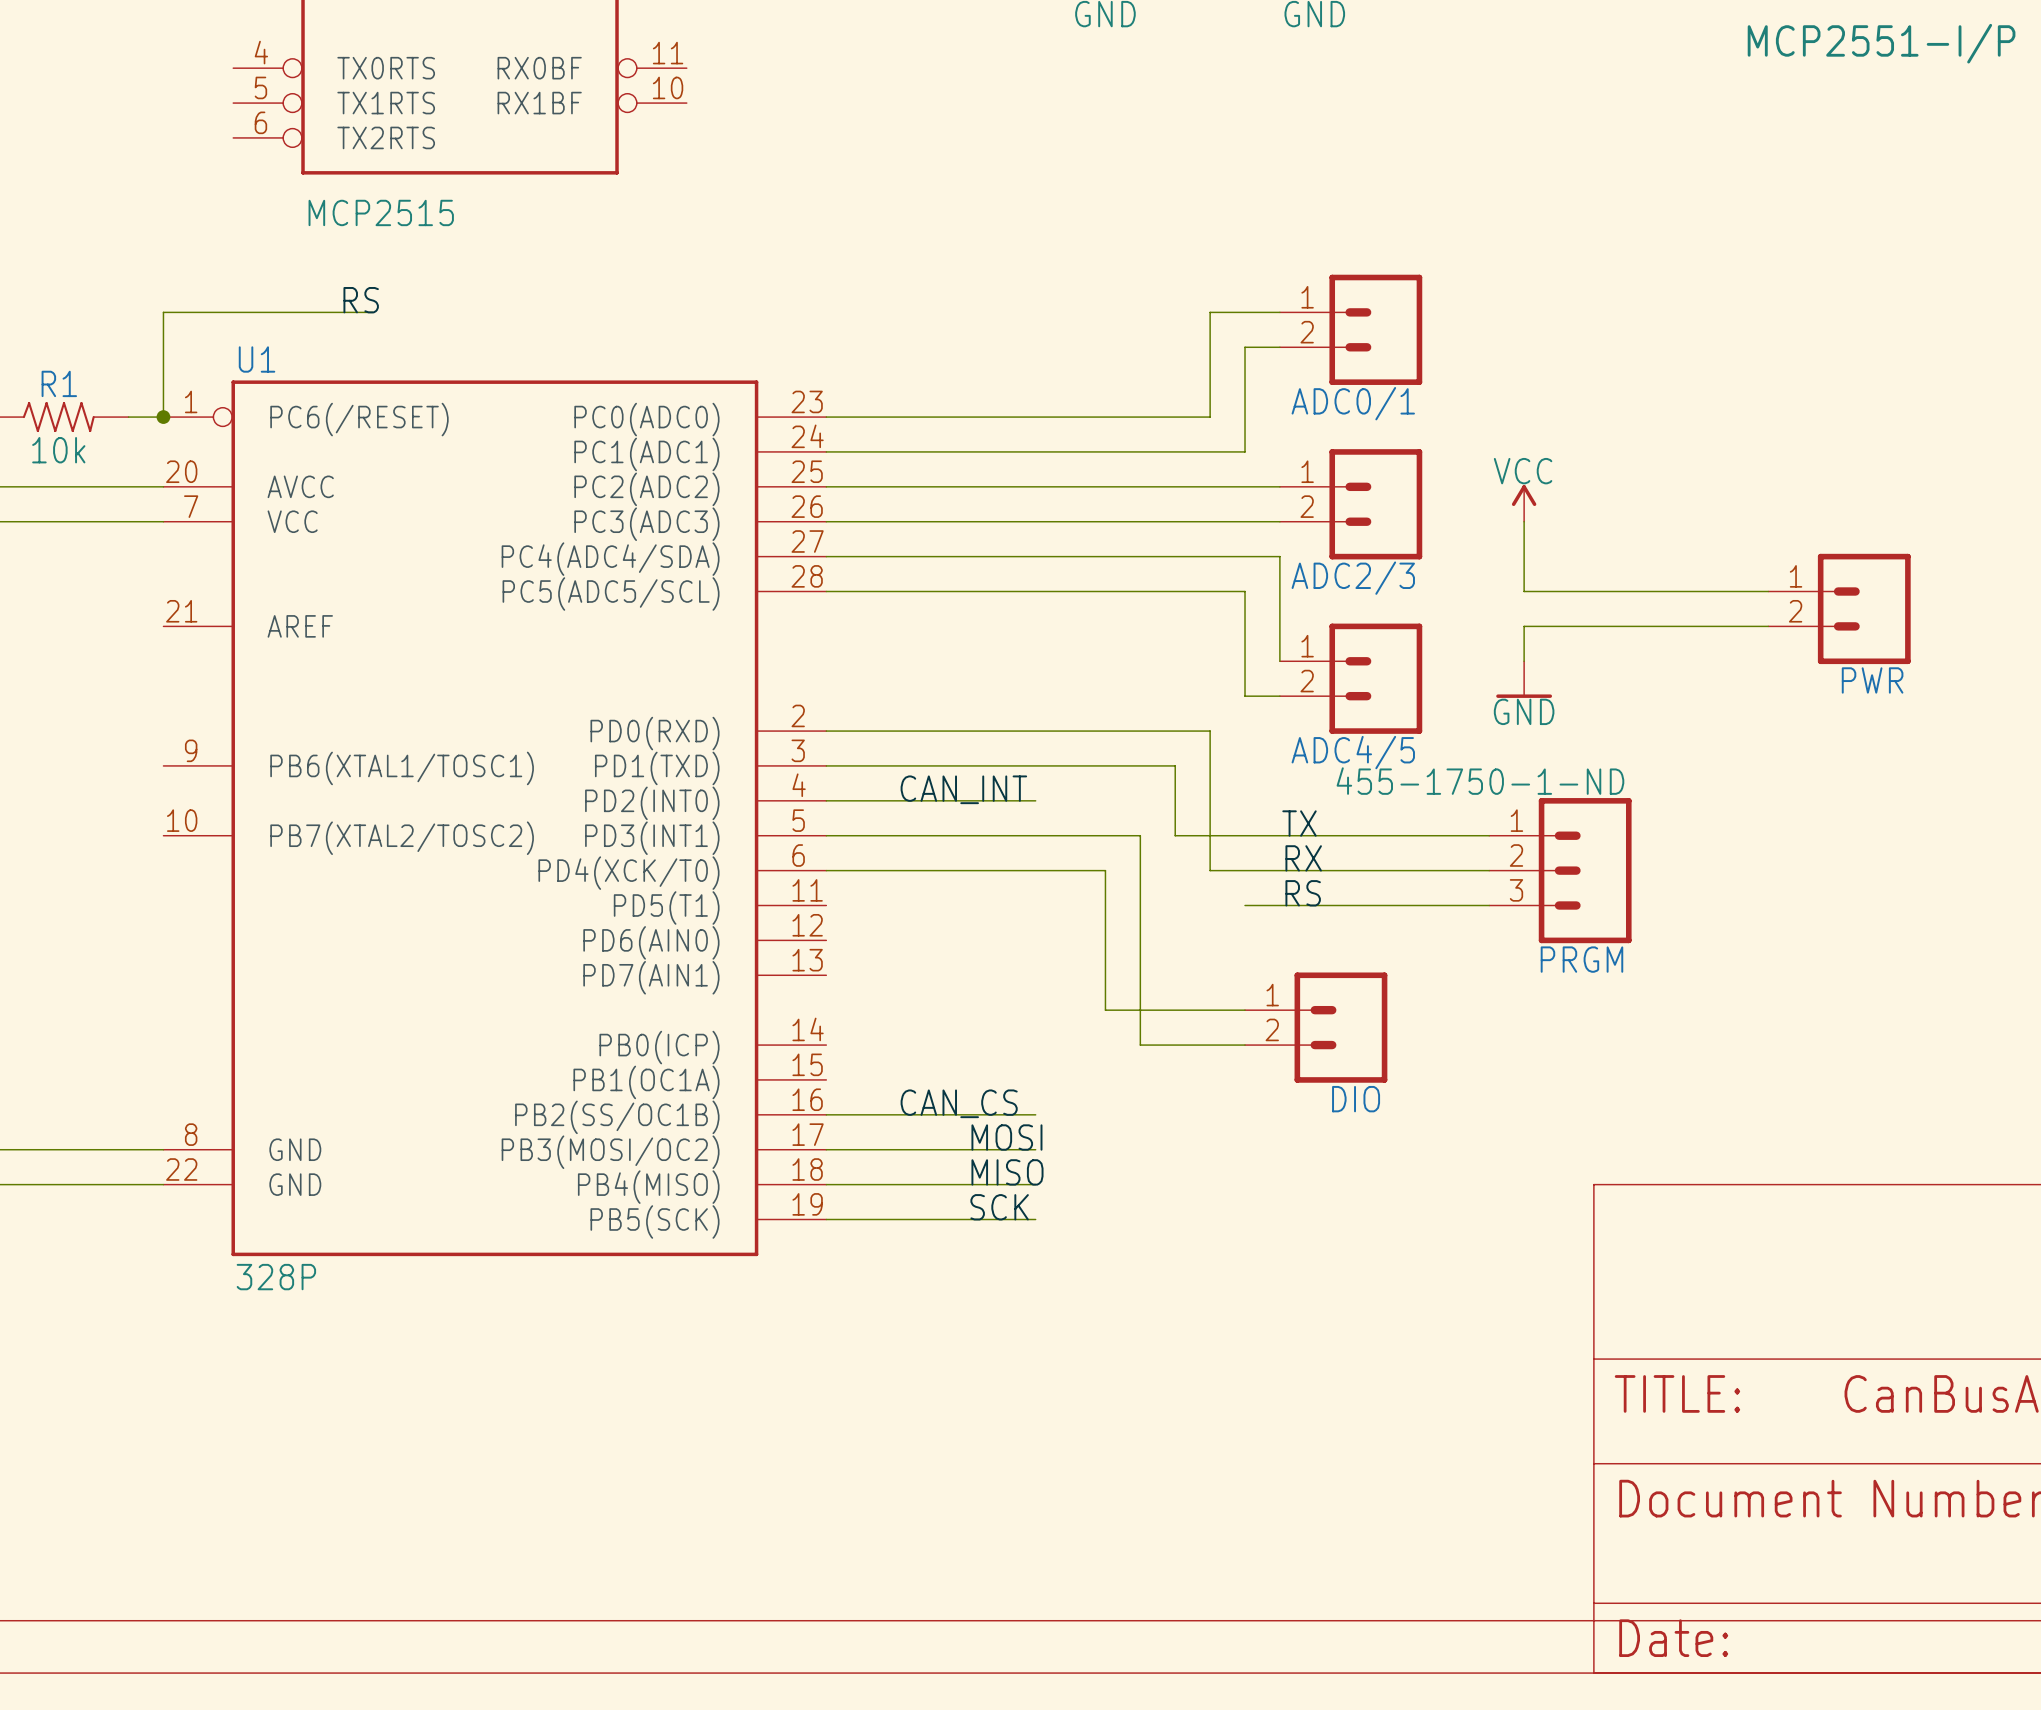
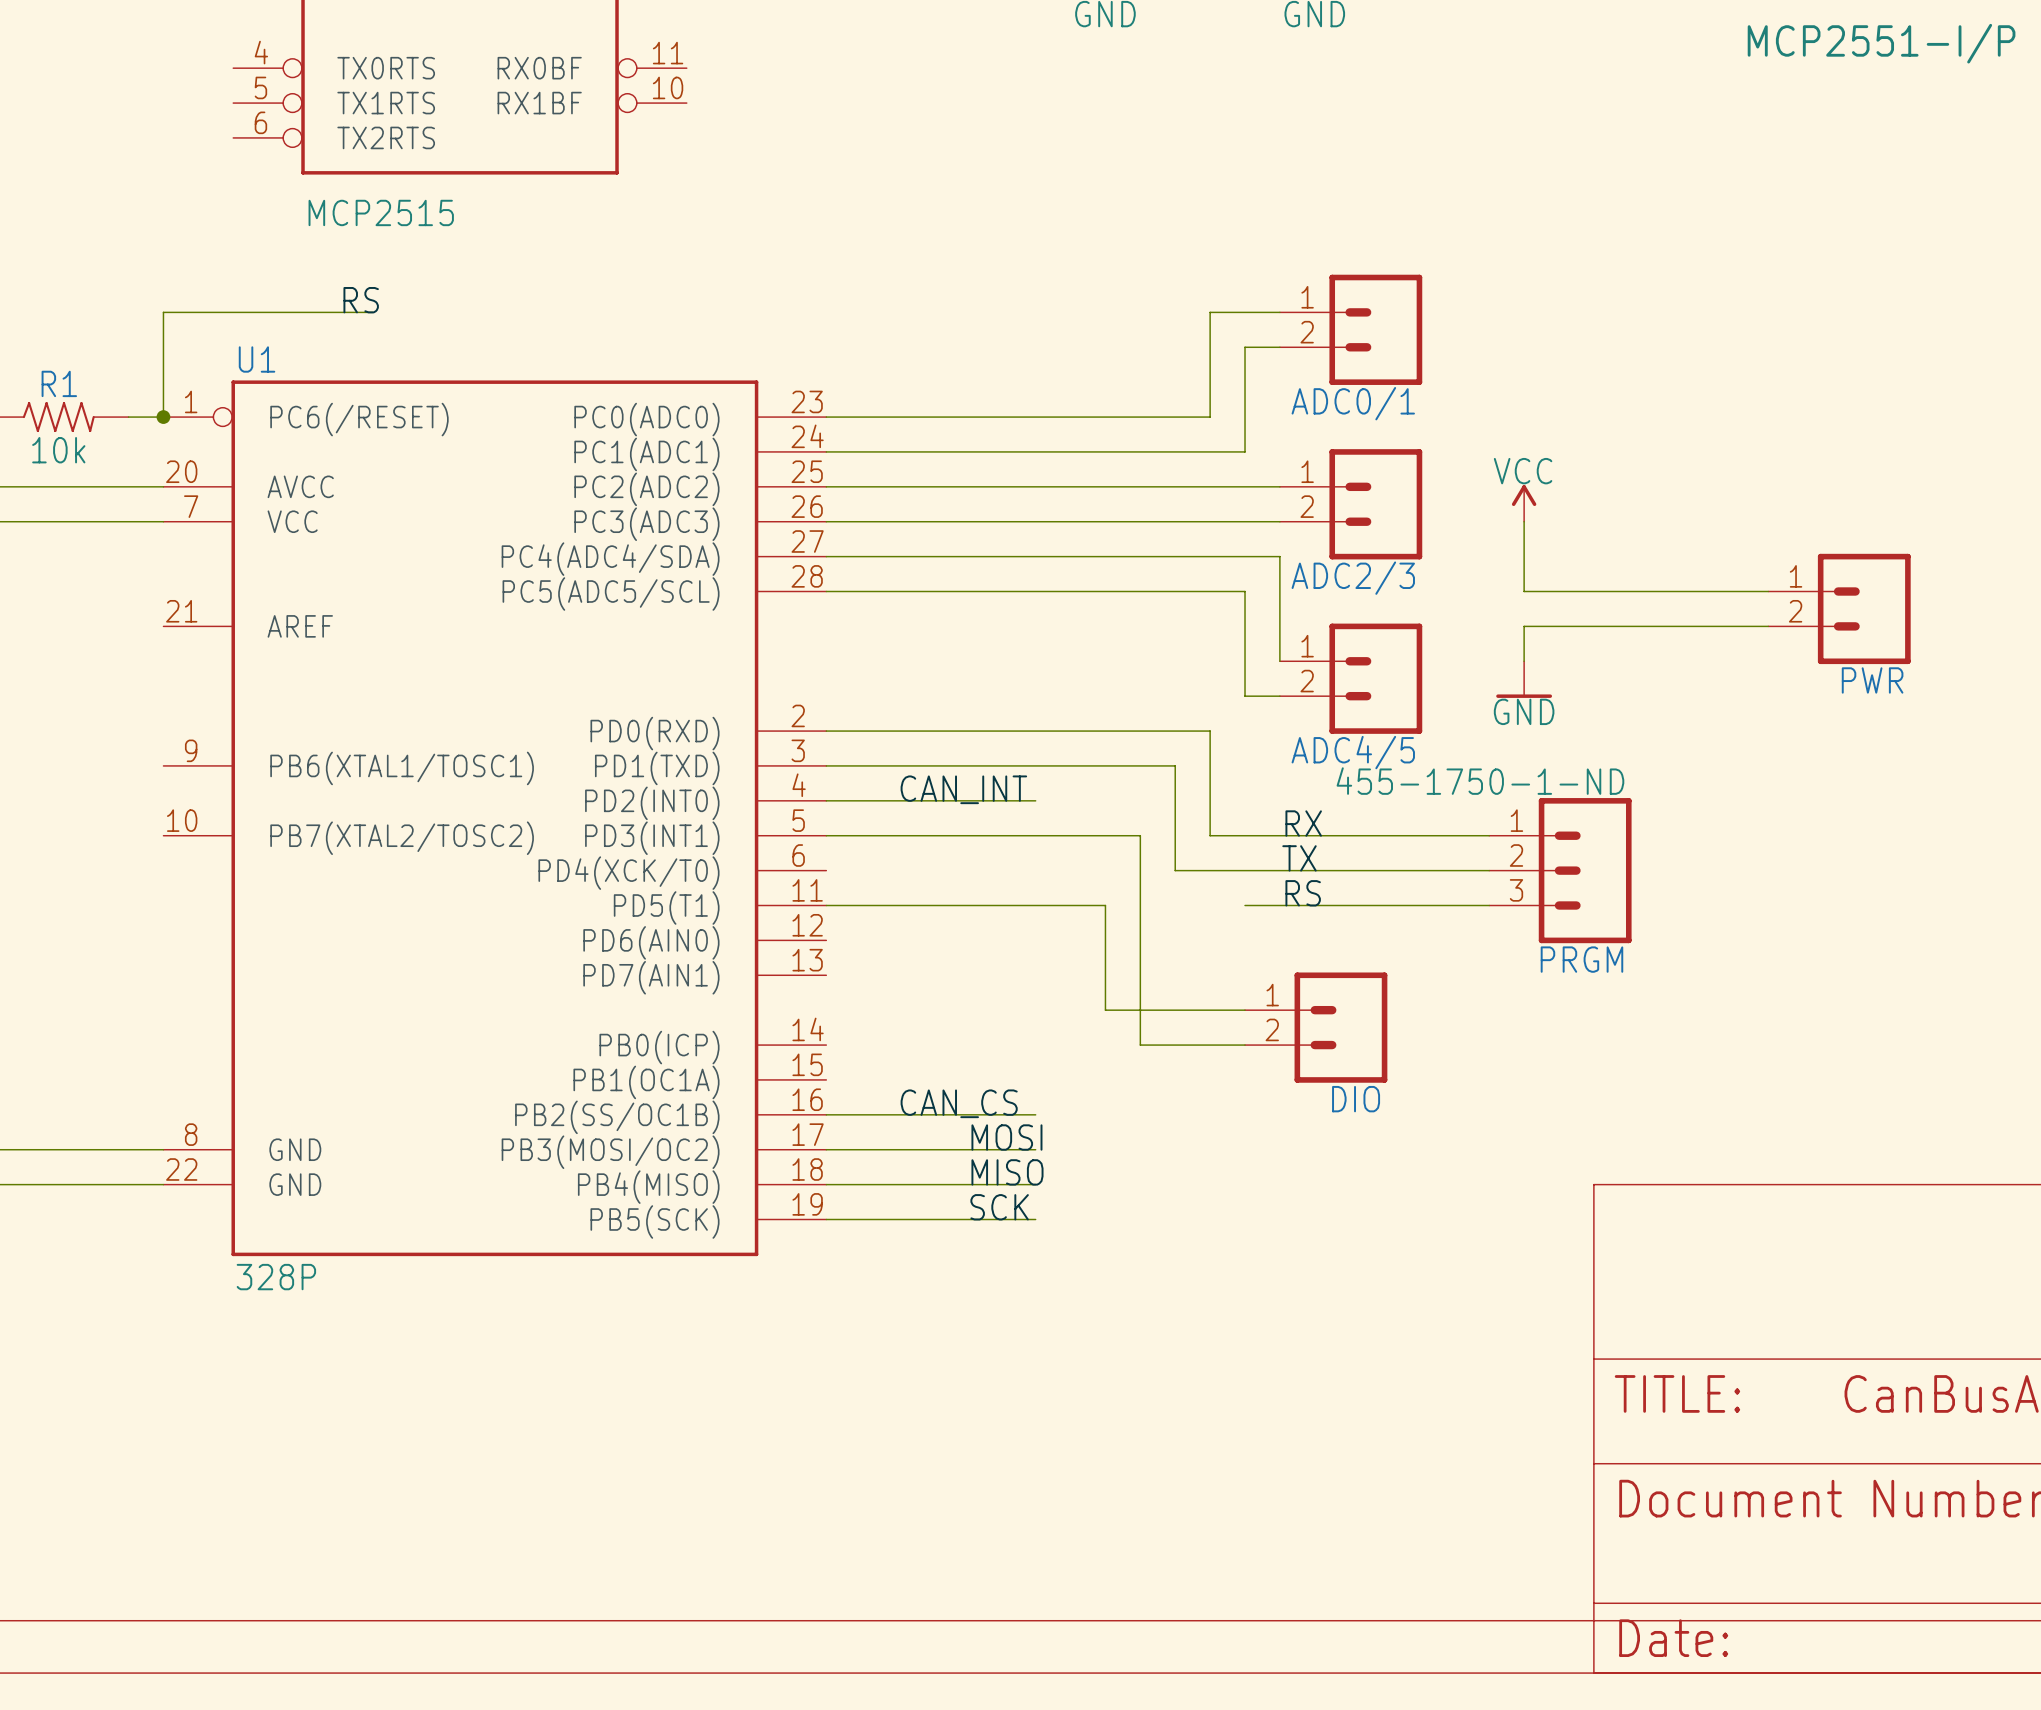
label: TX (1299, 823) -> RX (1303, 823)
wire: (1175, 835) (1210, 835) (1210, 870) -> (1175, 835) (1175, 870) (1210, 870)
label: RX (1303, 858) -> TX (1299, 858)
wire: (826, 870) (1105, 870) (1105, 905) -> (826, 905) (1105, 905)

